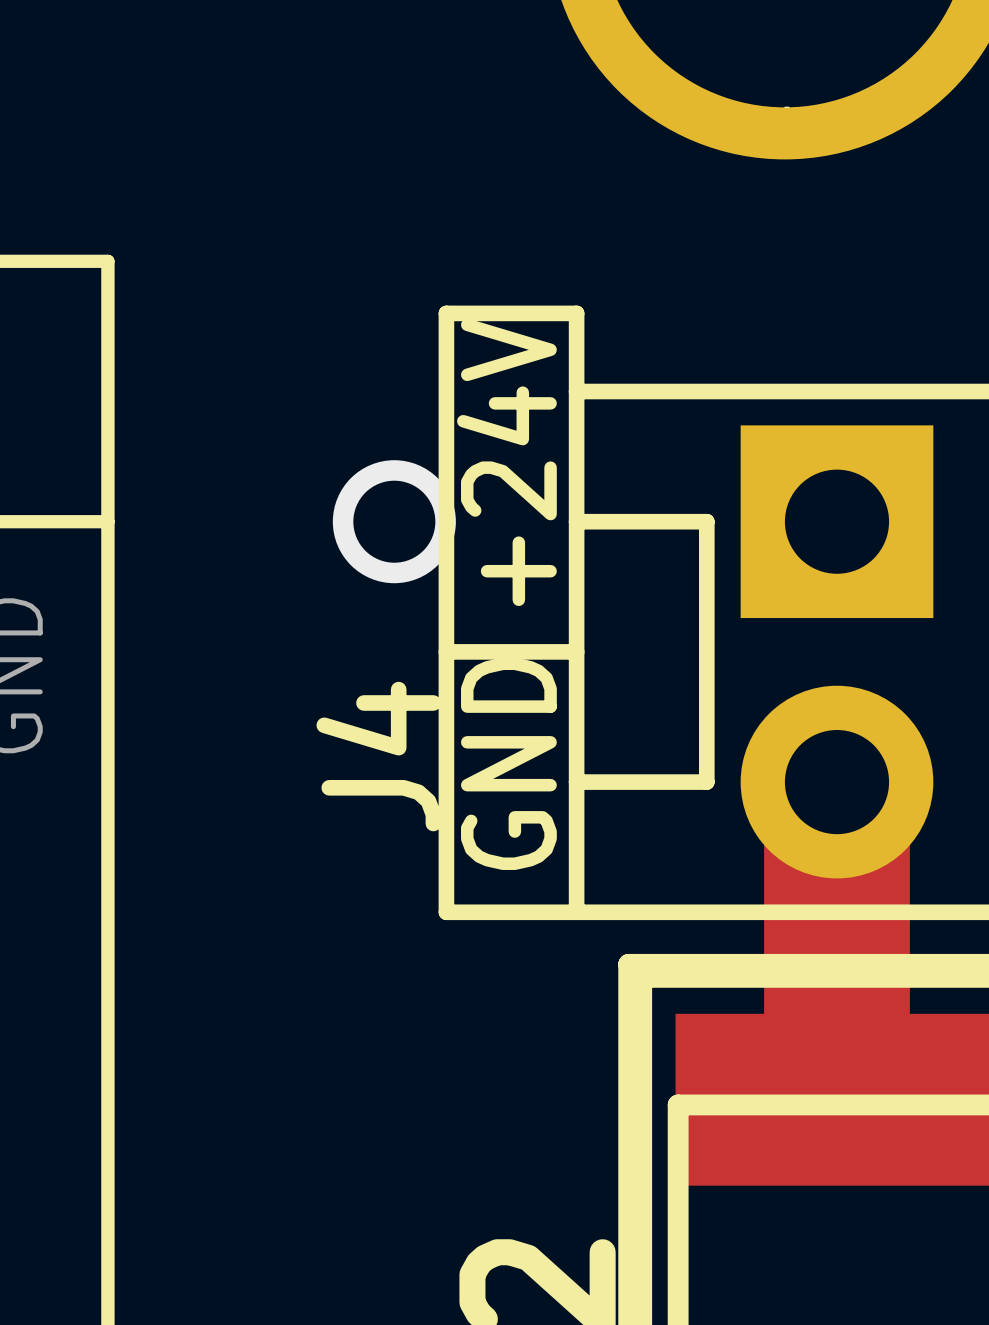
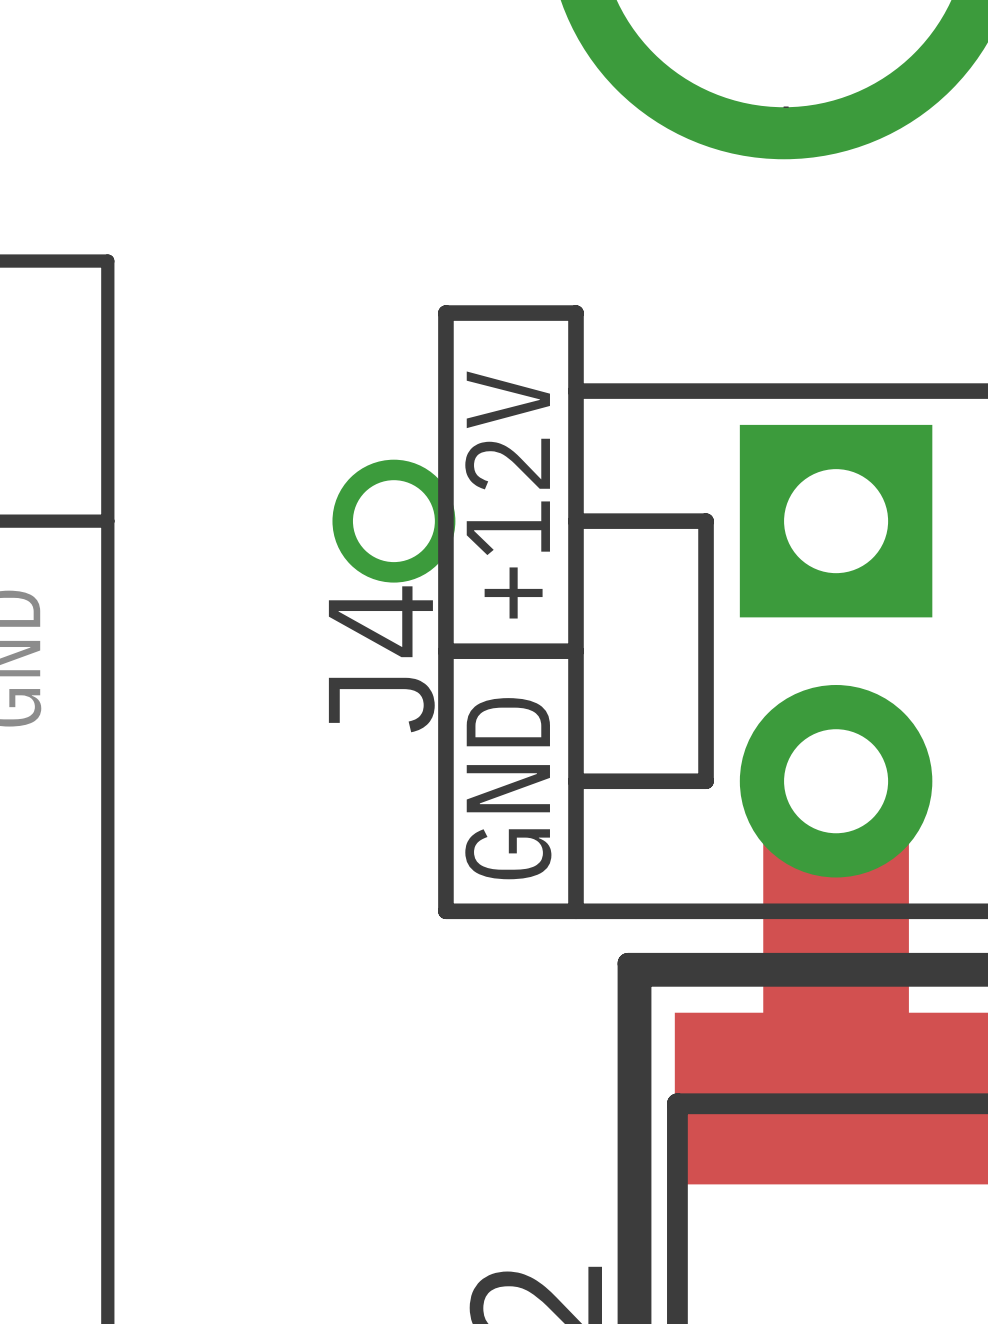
text: +24V (506, 462) -> +12V (507, 494)
J4 name position: J4 (378, 756) -> J4 (381, 659)

